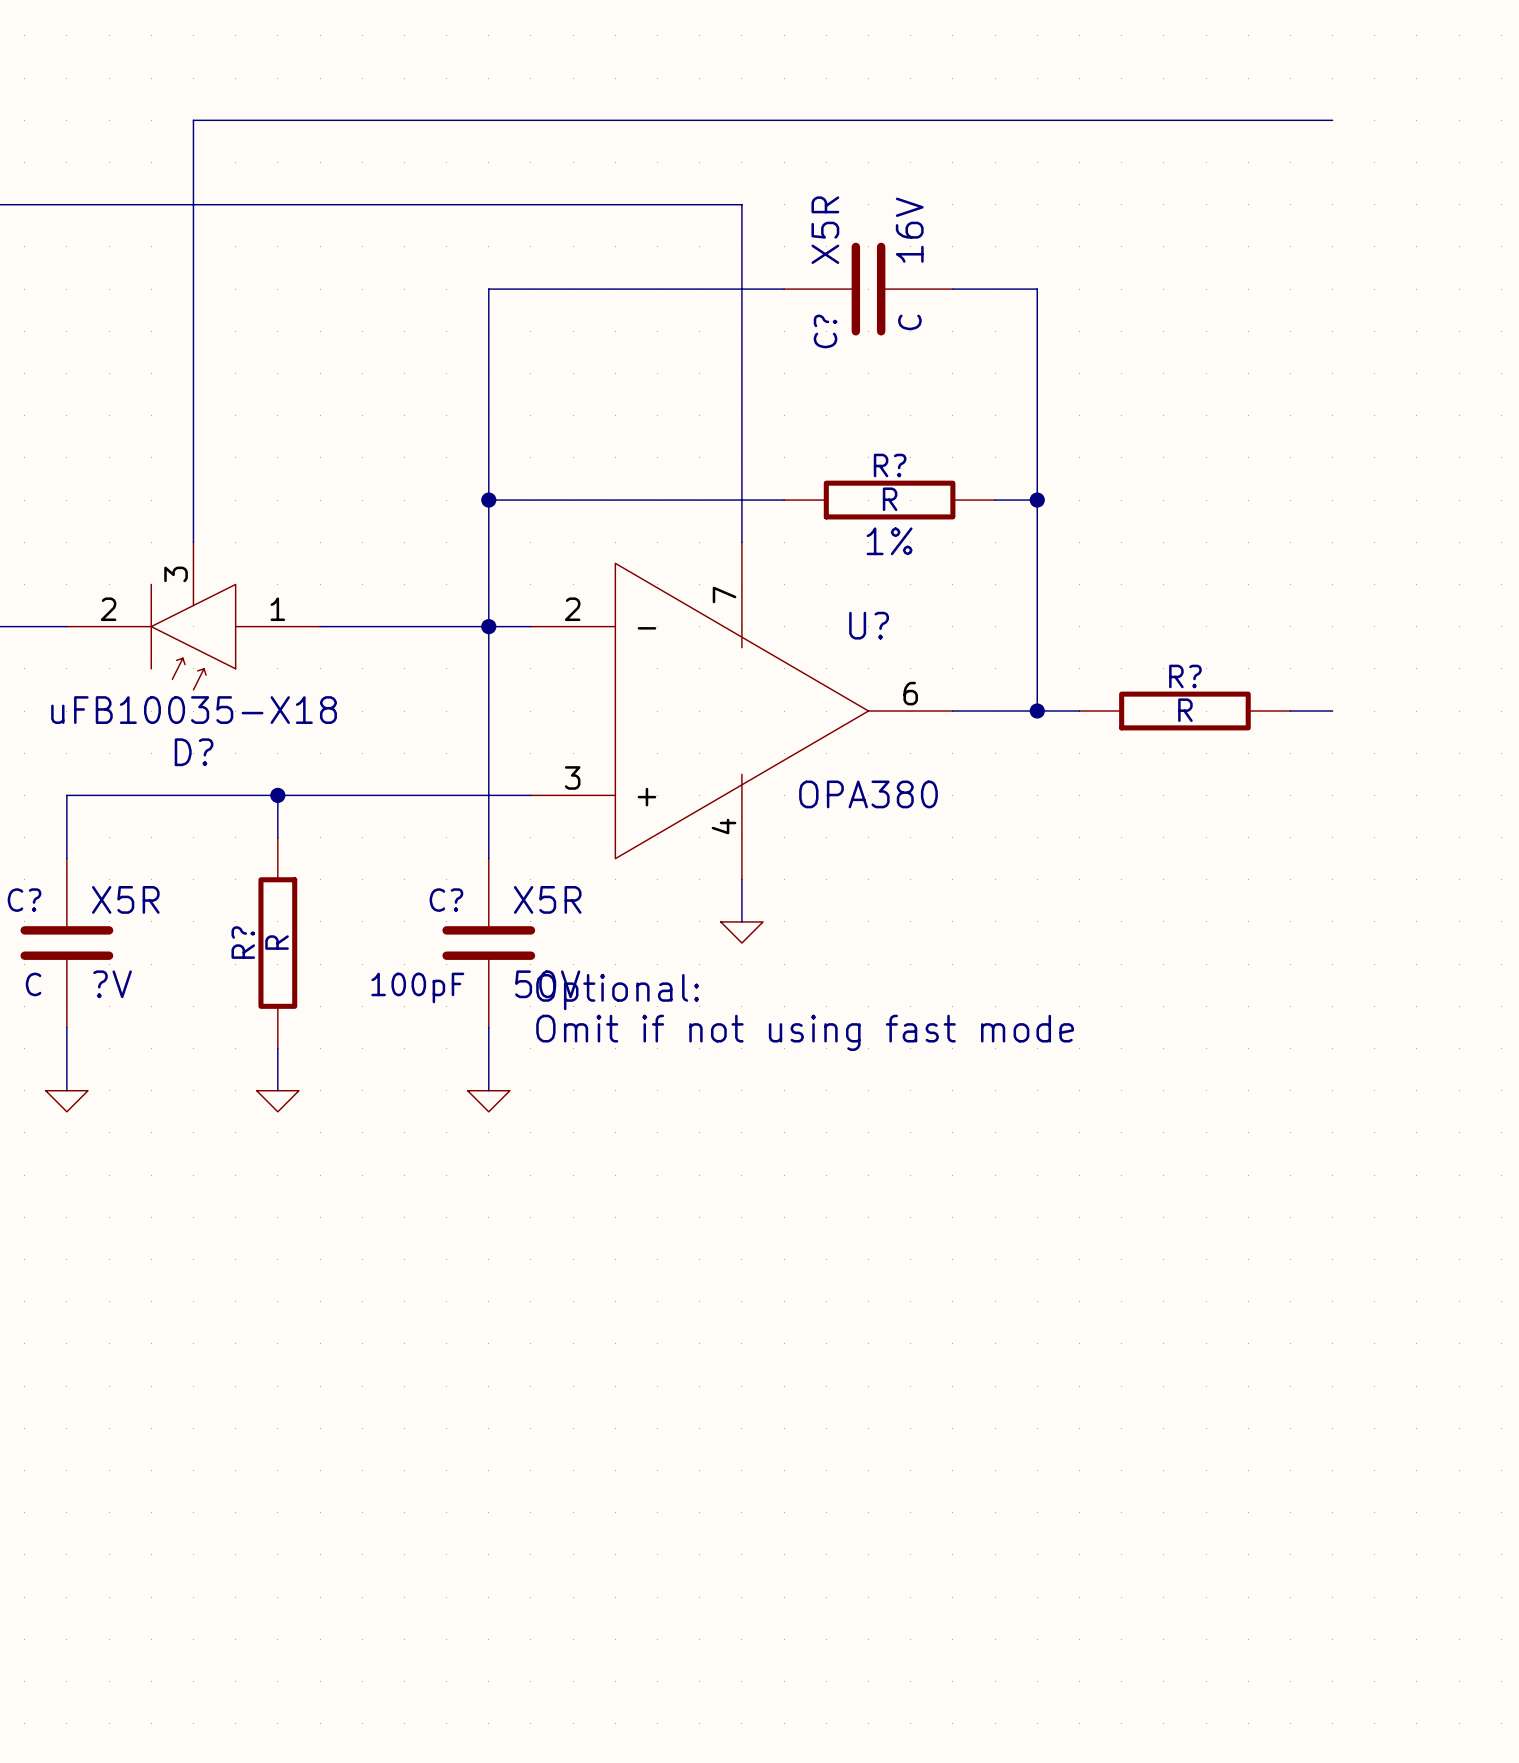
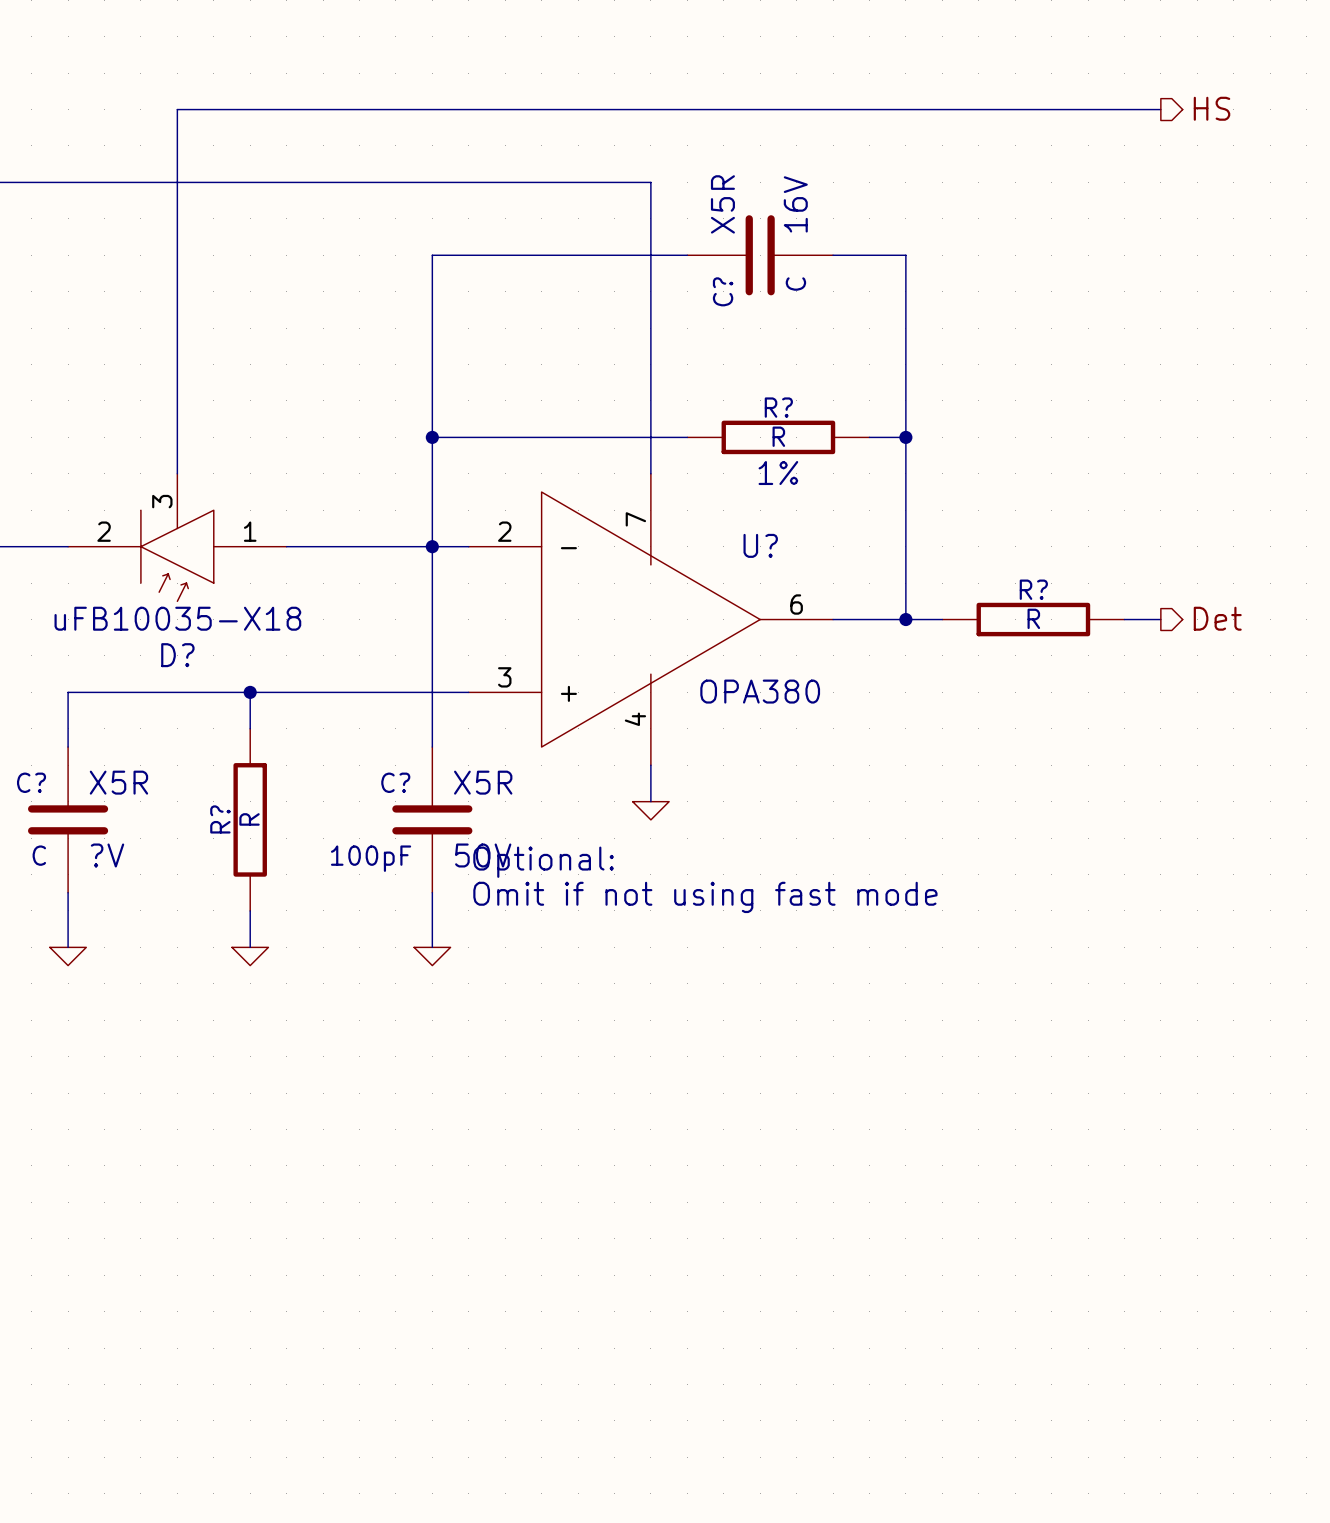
hierarchical label: none -> HS (1212, 108)
hierarchical label: none -> Det (1217, 618)

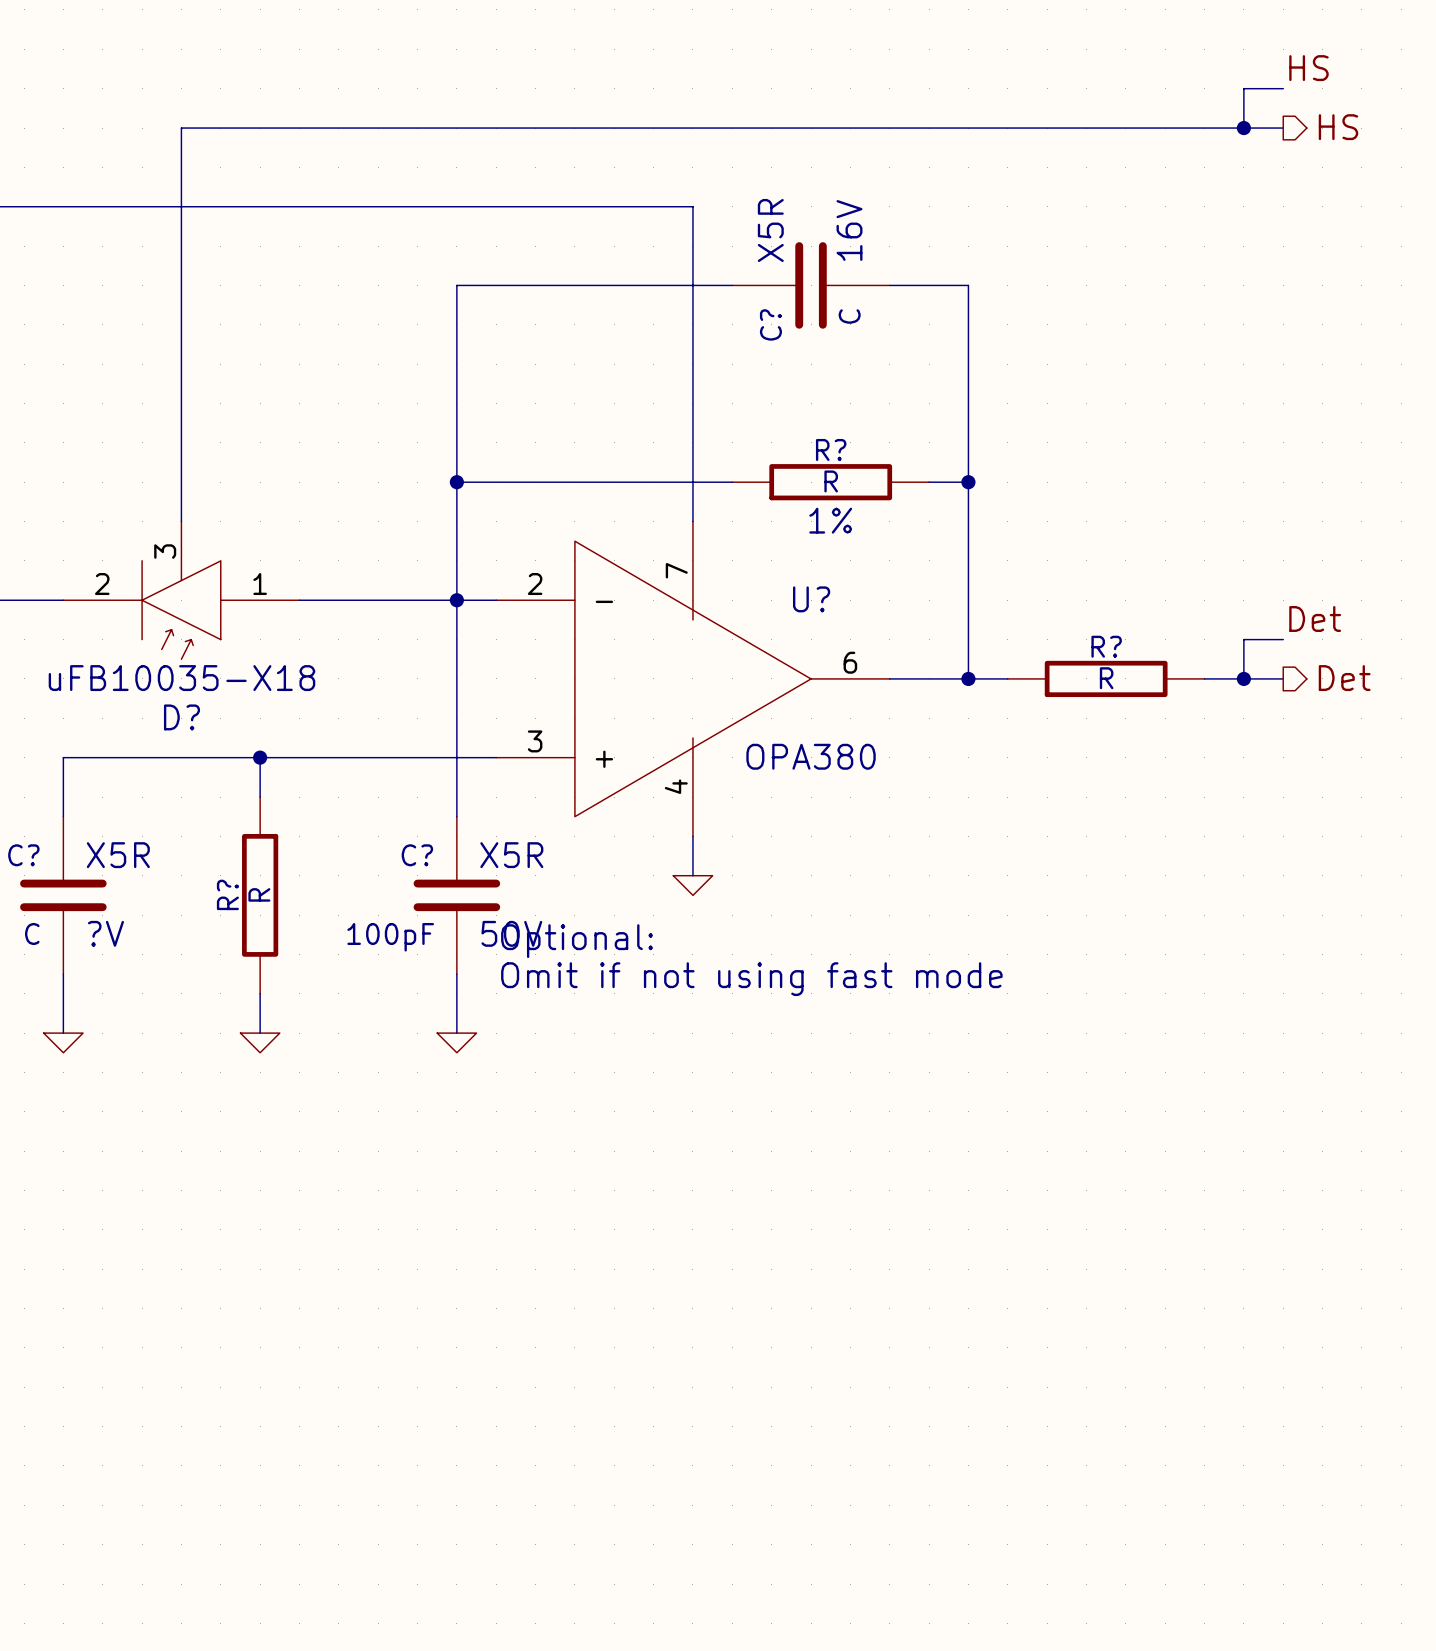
label: none -> HS (1308, 68)
wire: none -> (1283, 88) (1243, 88) (1243, 128) (1283, 128)
hierarchical label position: HS (1212, 108) -> HS (1338, 127)
junction: none -> (1243, 128)
label: none -> Det (1315, 619)
wire: none -> (1283, 639) (1243, 639) (1243, 678) (1283, 678)
hierarchical label position: Det (1217, 618) -> Det (1344, 678)
junction: none -> (1243, 678)

